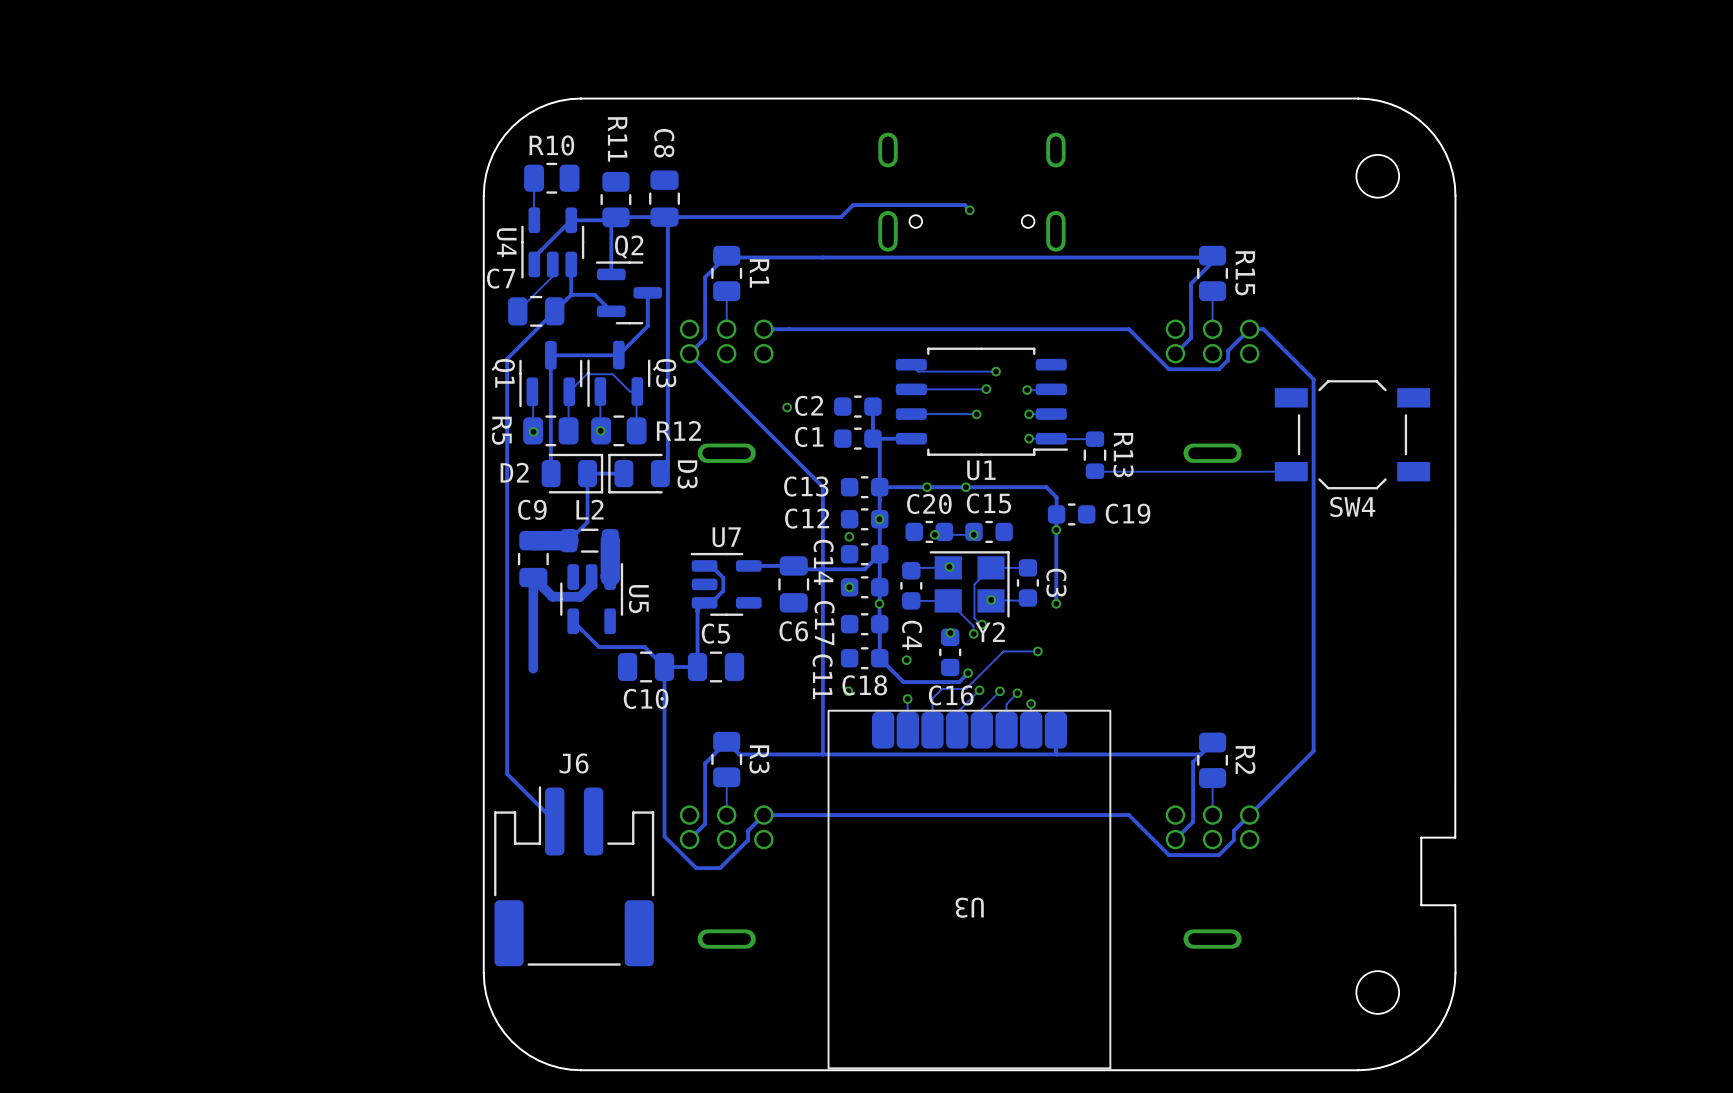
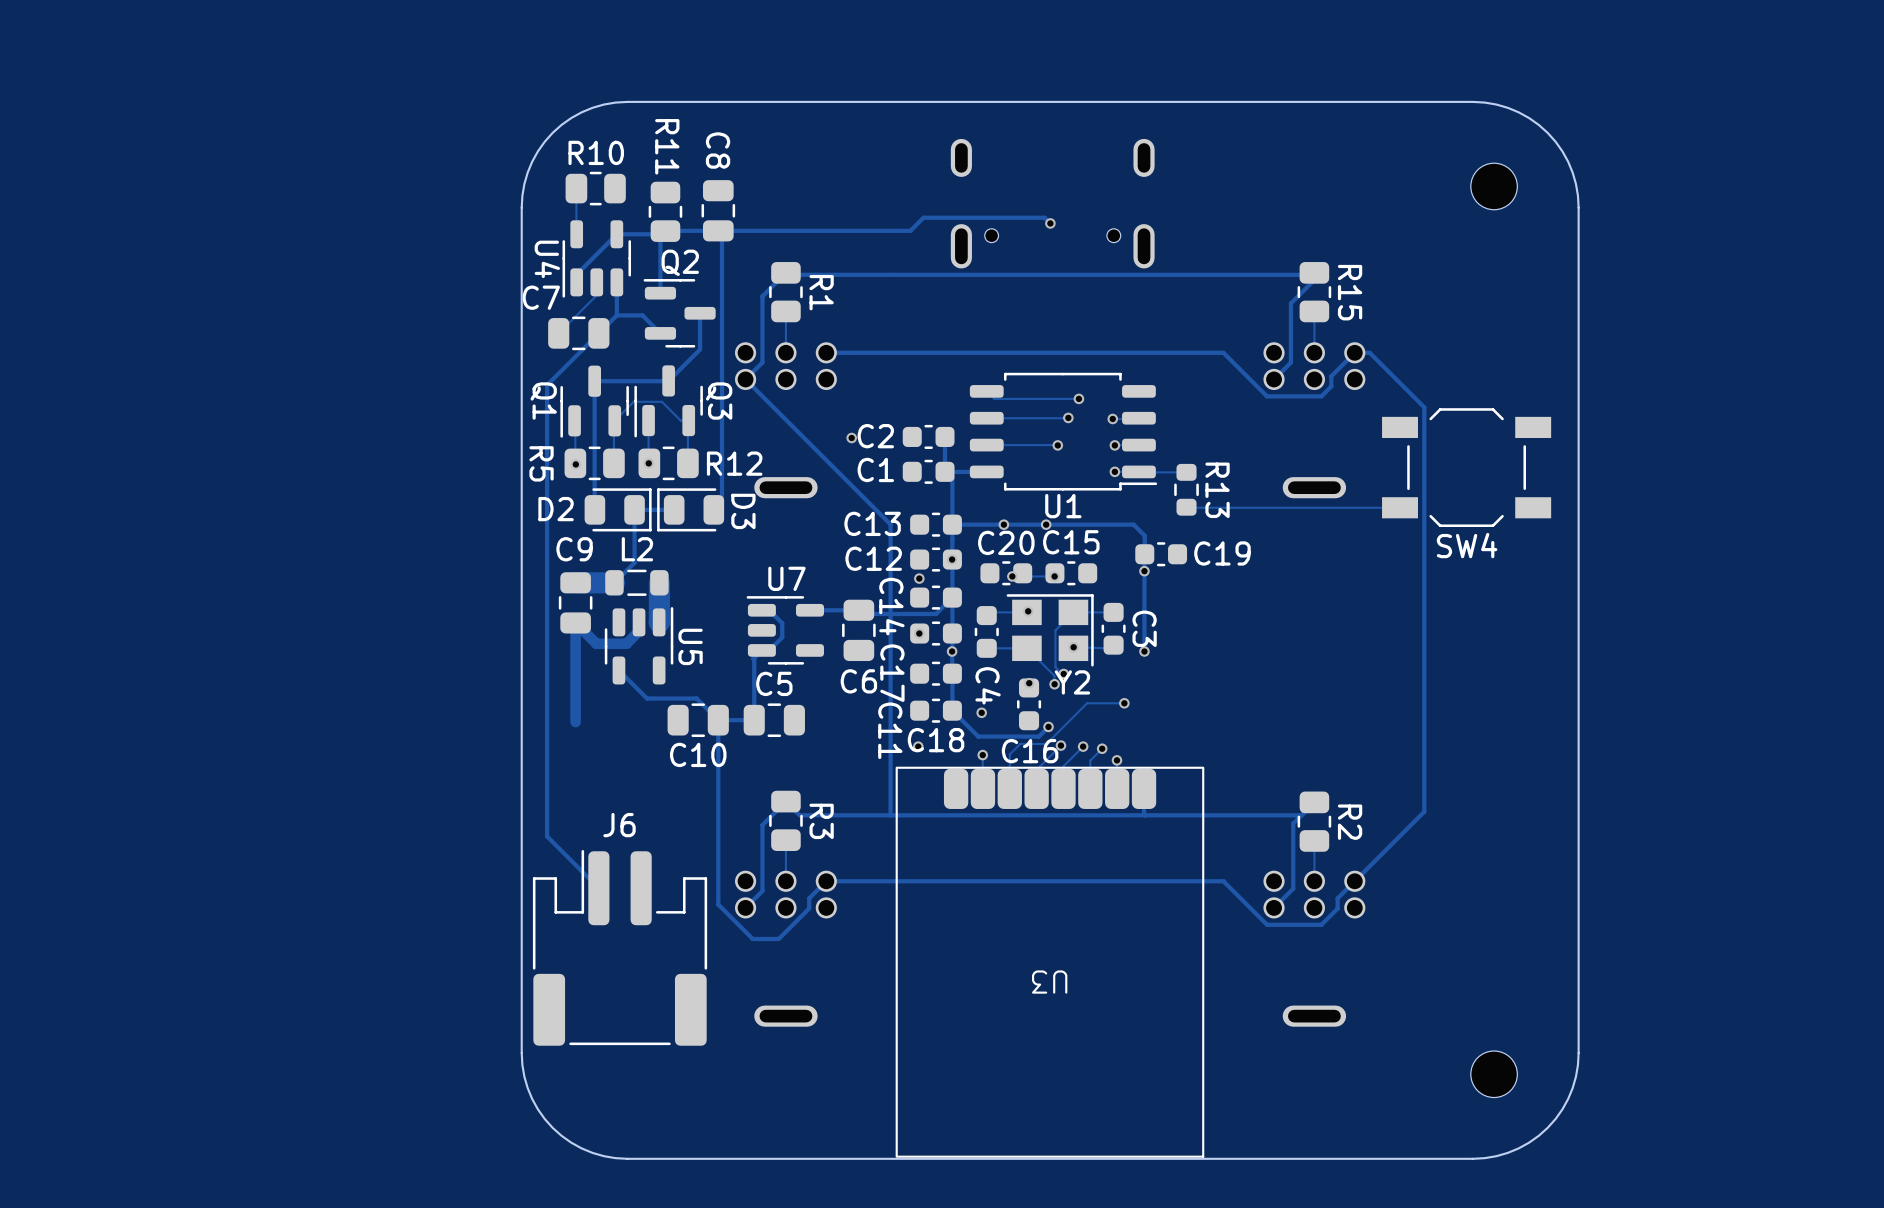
board edge: (1455, 195) (1455, 837) (1421, 837) (1421, 905) (1455, 905) (1455, 973) -> (1578, 207) (1578, 1053)

